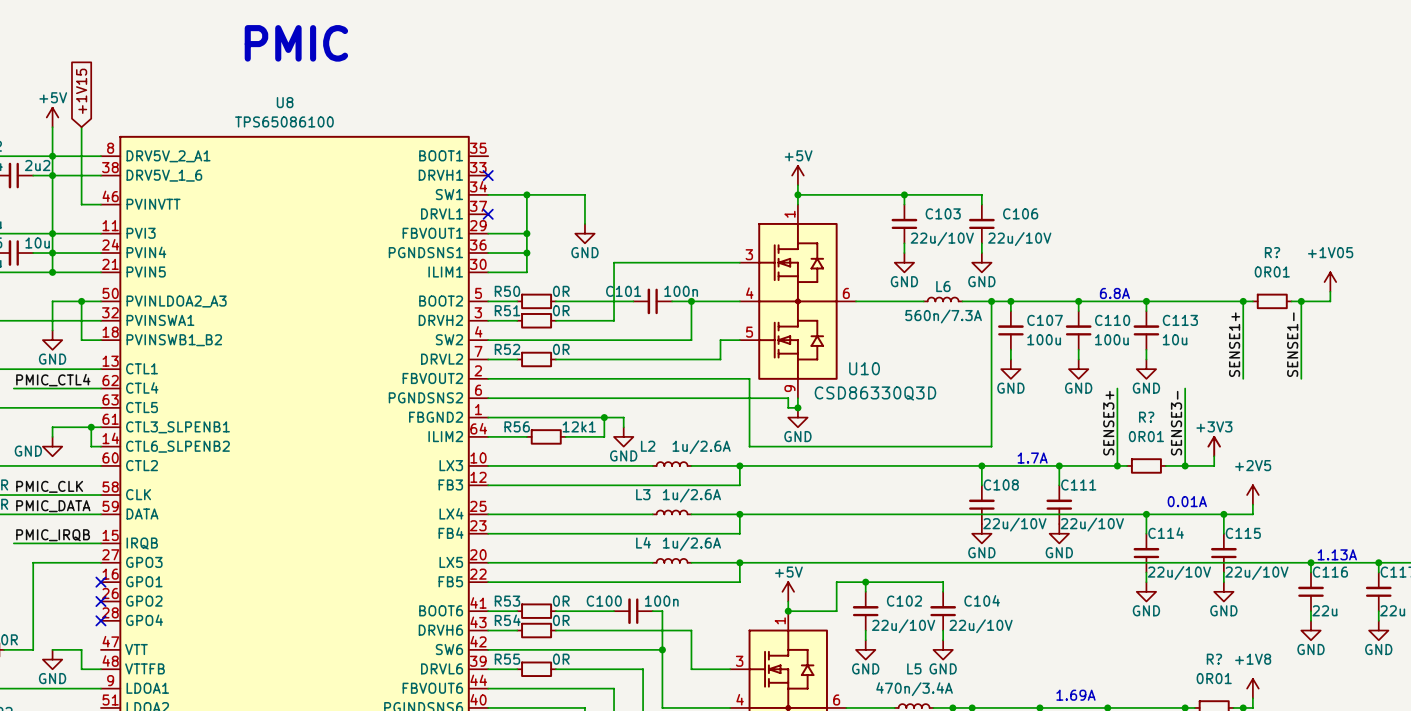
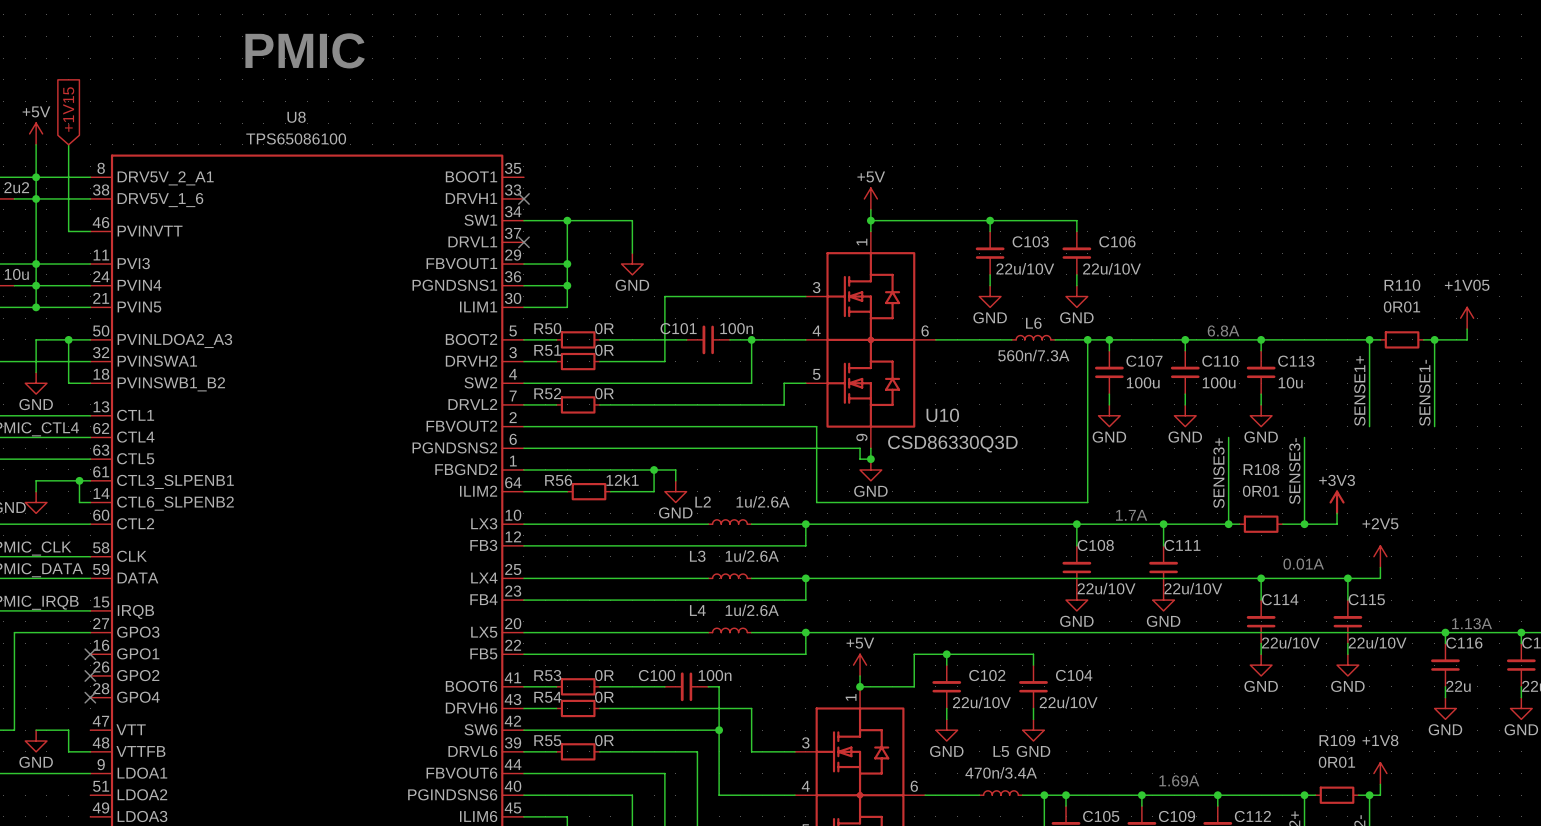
R? name: R? (1272, 252) -> R110 (1402, 285)
R? name: R? (1146, 417) -> R108 (1261, 469)
R? name: R? (1214, 659) -> R109 (1337, 740)

